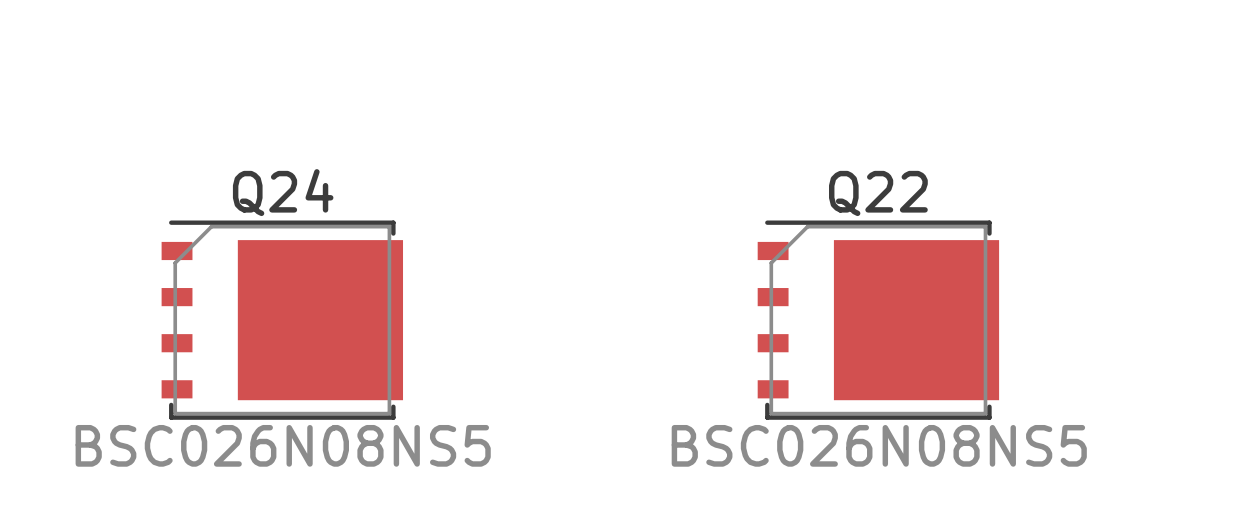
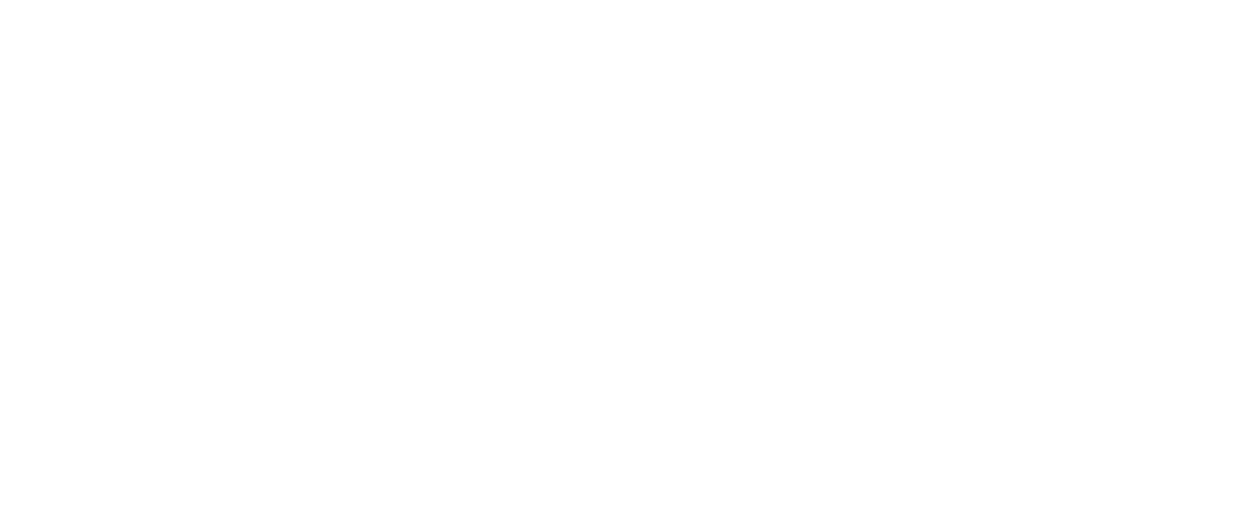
Q24: BSC026N08NS5 (282, 320) -> none
Q22: BSC026N08NS5 (878, 320) -> none

